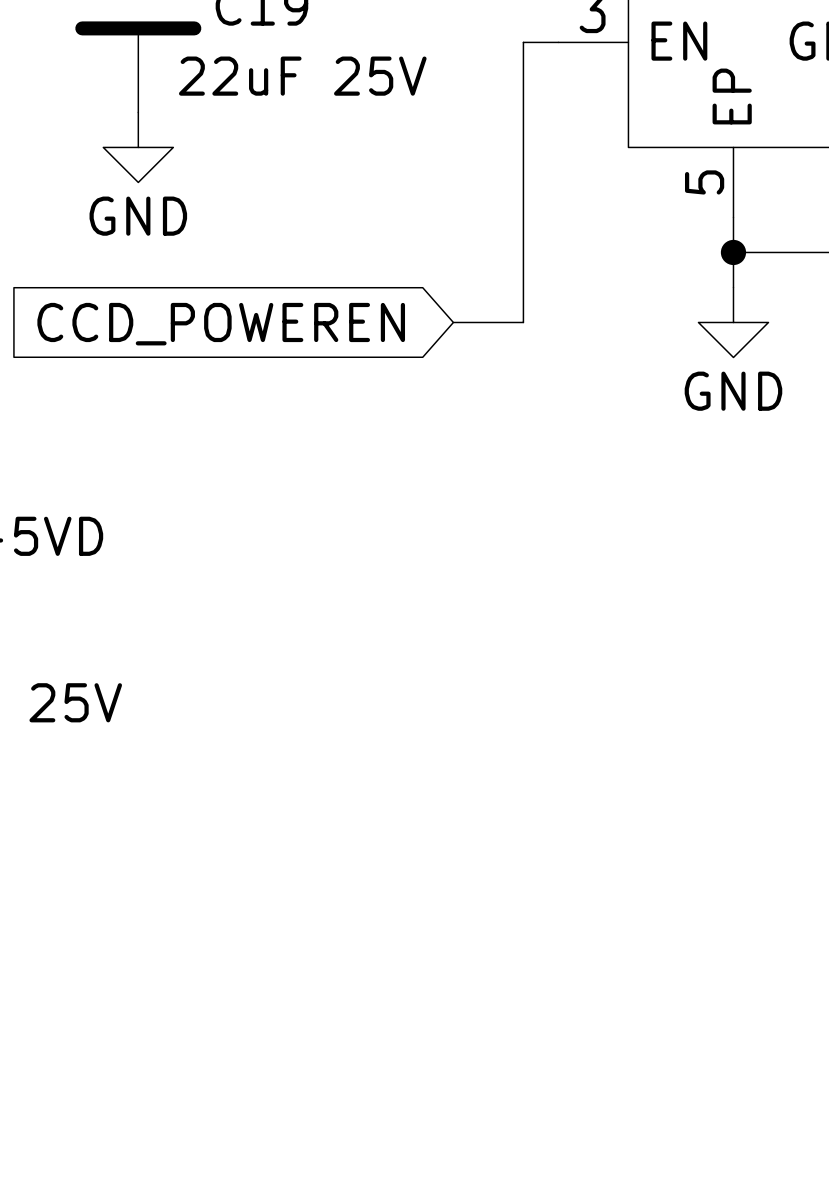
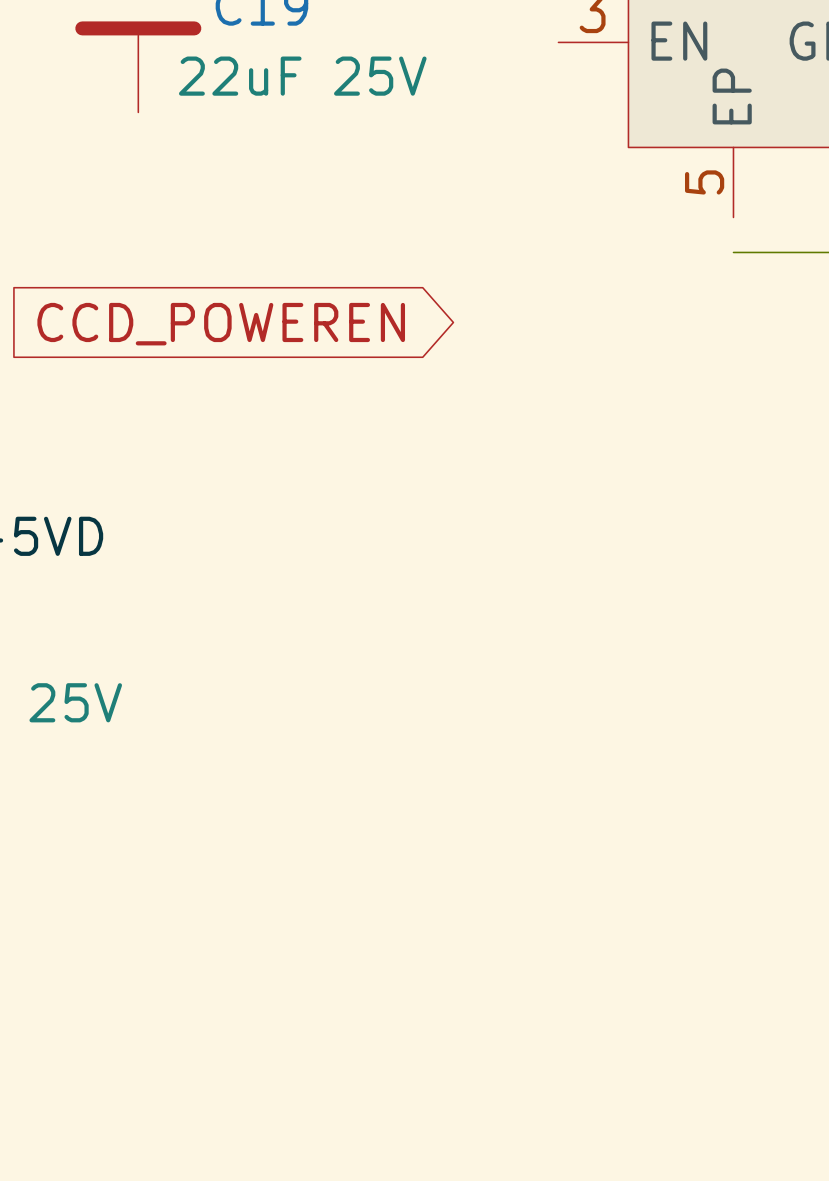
wire: (558, 42) (523, 42) (523, 322) (453, 322) -> none
power symbol: GND (138, 147) -> none
wire: (733, 217) (733, 287) -> none
junction: (733, 252) -> none
power symbol: GND (733, 322) -> none

